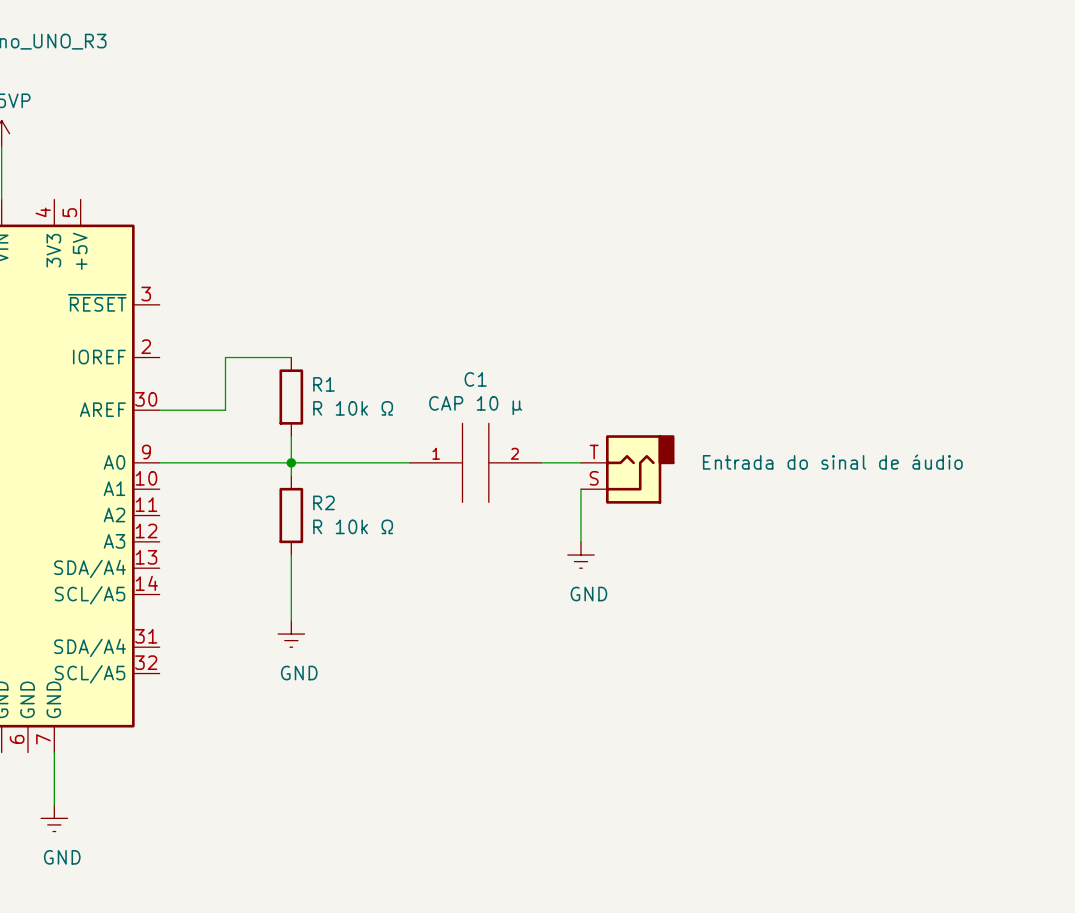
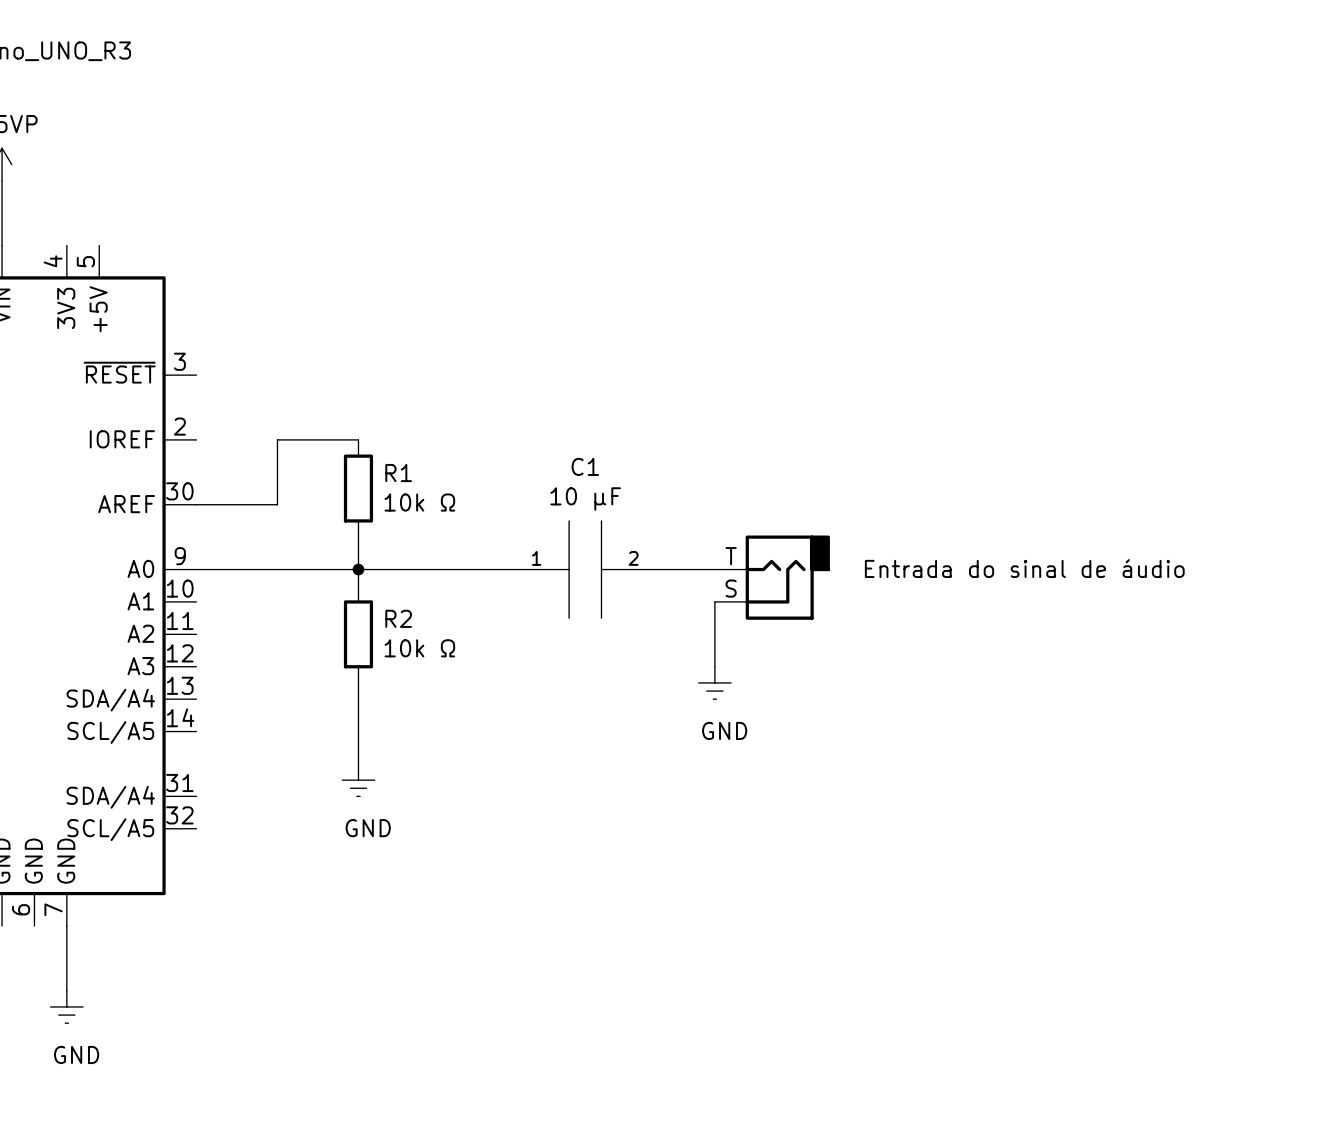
C1 value: CAP 10 μ (475, 405) -> 10 μF (585, 499)
R1 value: R 10k Ω (353, 408) -> 10k Ω (419, 502)
R2 value: R 10k Ω (353, 526) -> 10k Ω (419, 648)

